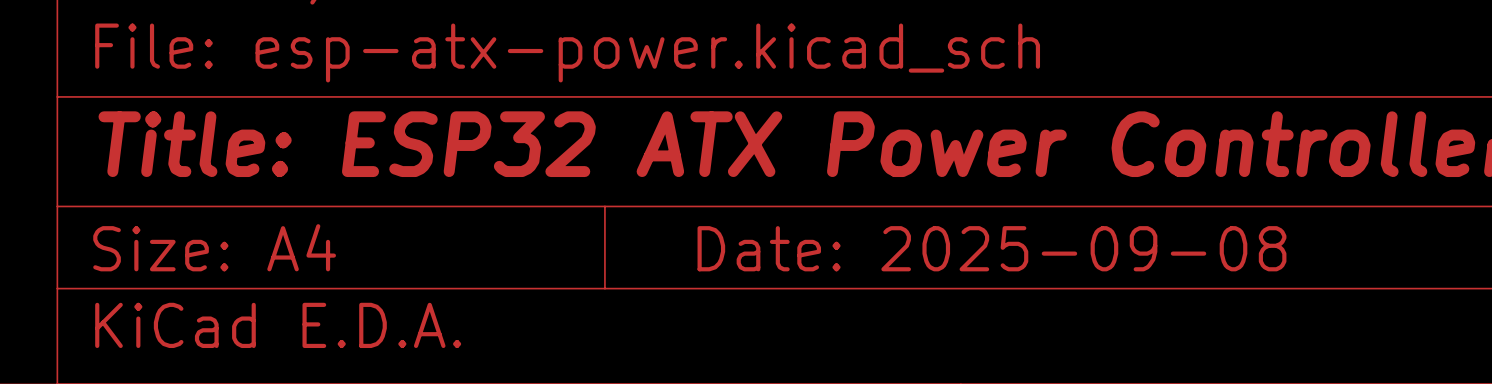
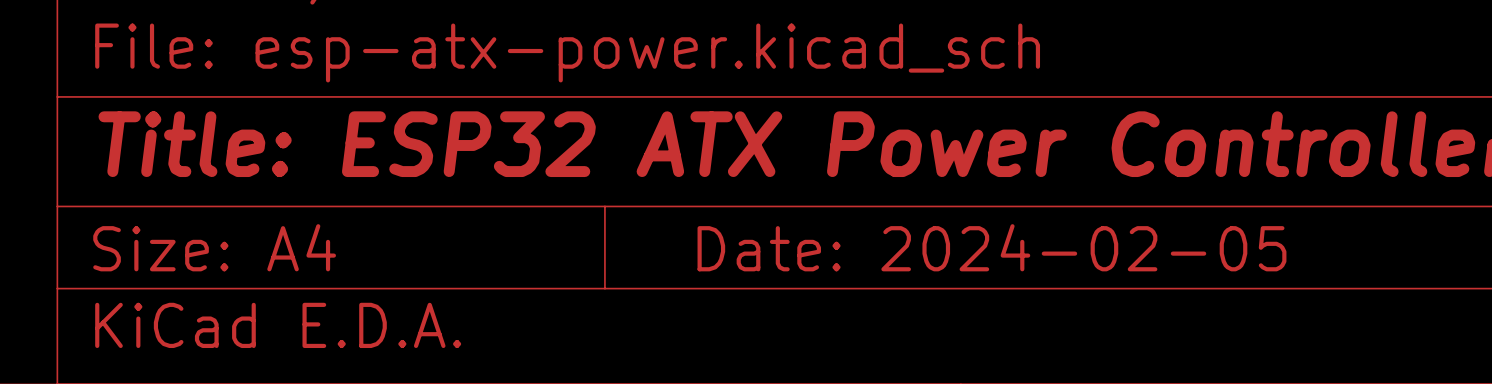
title block: Date: 2025-09-08 (991, 248) -> Date: 2024-02-05 (991, 247)

